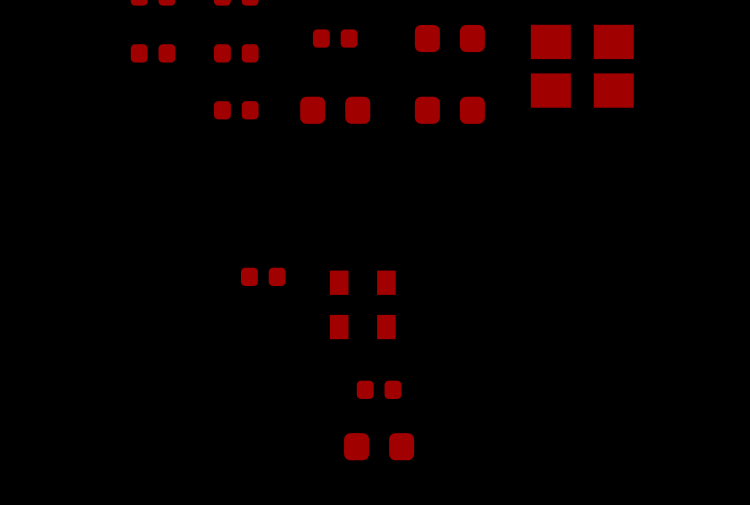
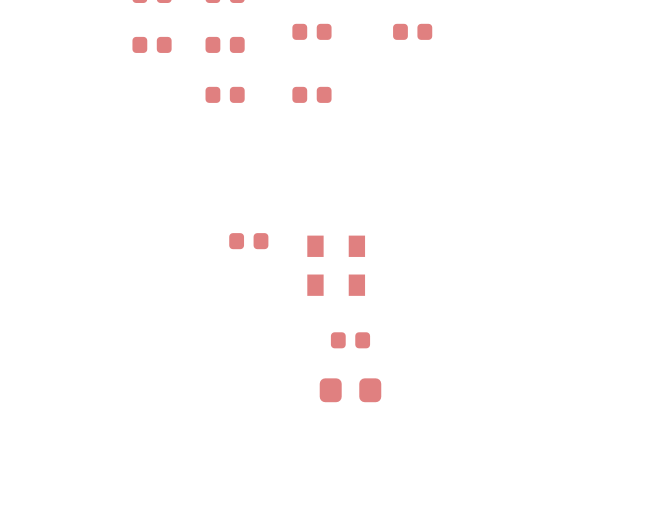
part footprint: [414, 24, 485, 53] -> [393, 23, 433, 40]
part: (582, 66) -> none
part footprint: [300, 96, 371, 124] -> [292, 86, 332, 103]
part: (449, 110) -> none

